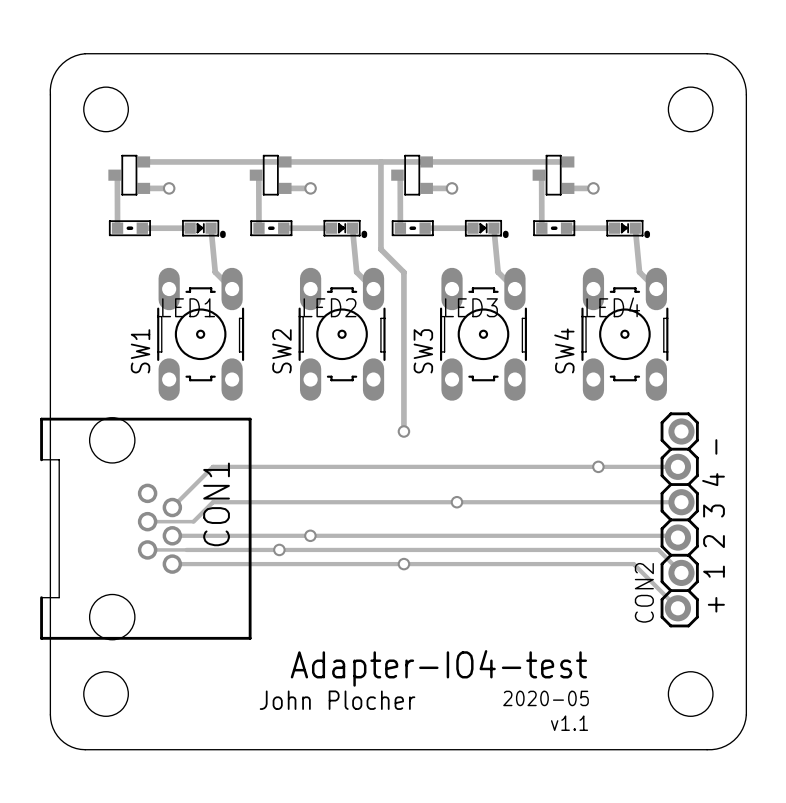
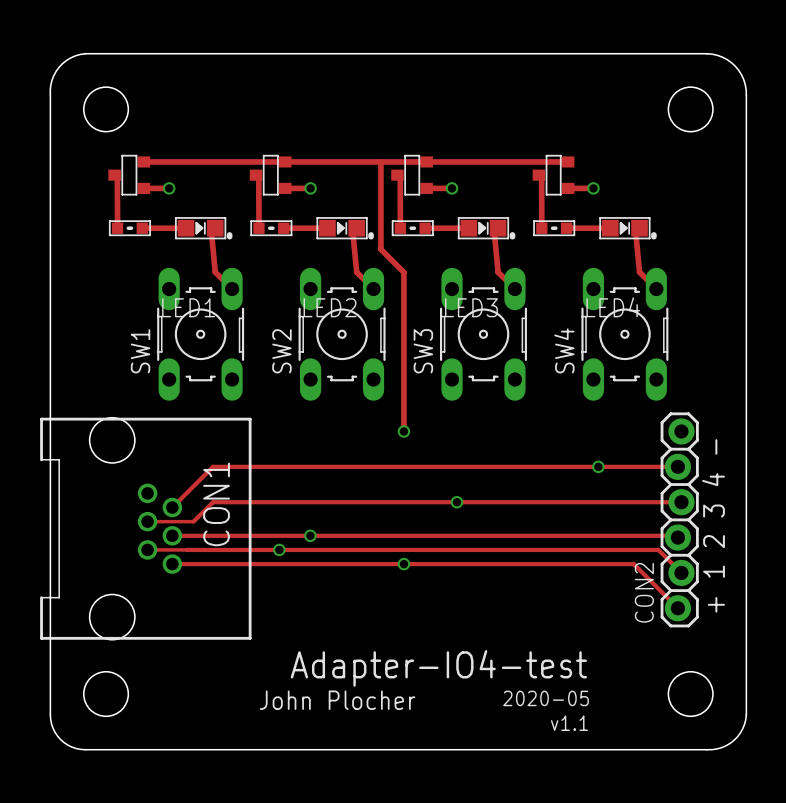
LED1 footprint: [182, 219, 226, 239] -> [175, 217, 233, 240]
LED2 footprint: [323, 219, 368, 239] -> [316, 217, 374, 240]
LED3 footprint: [464, 219, 509, 239] -> [457, 217, 516, 240]
LED4 footprint: [606, 219, 651, 239] -> [599, 217, 657, 240]

